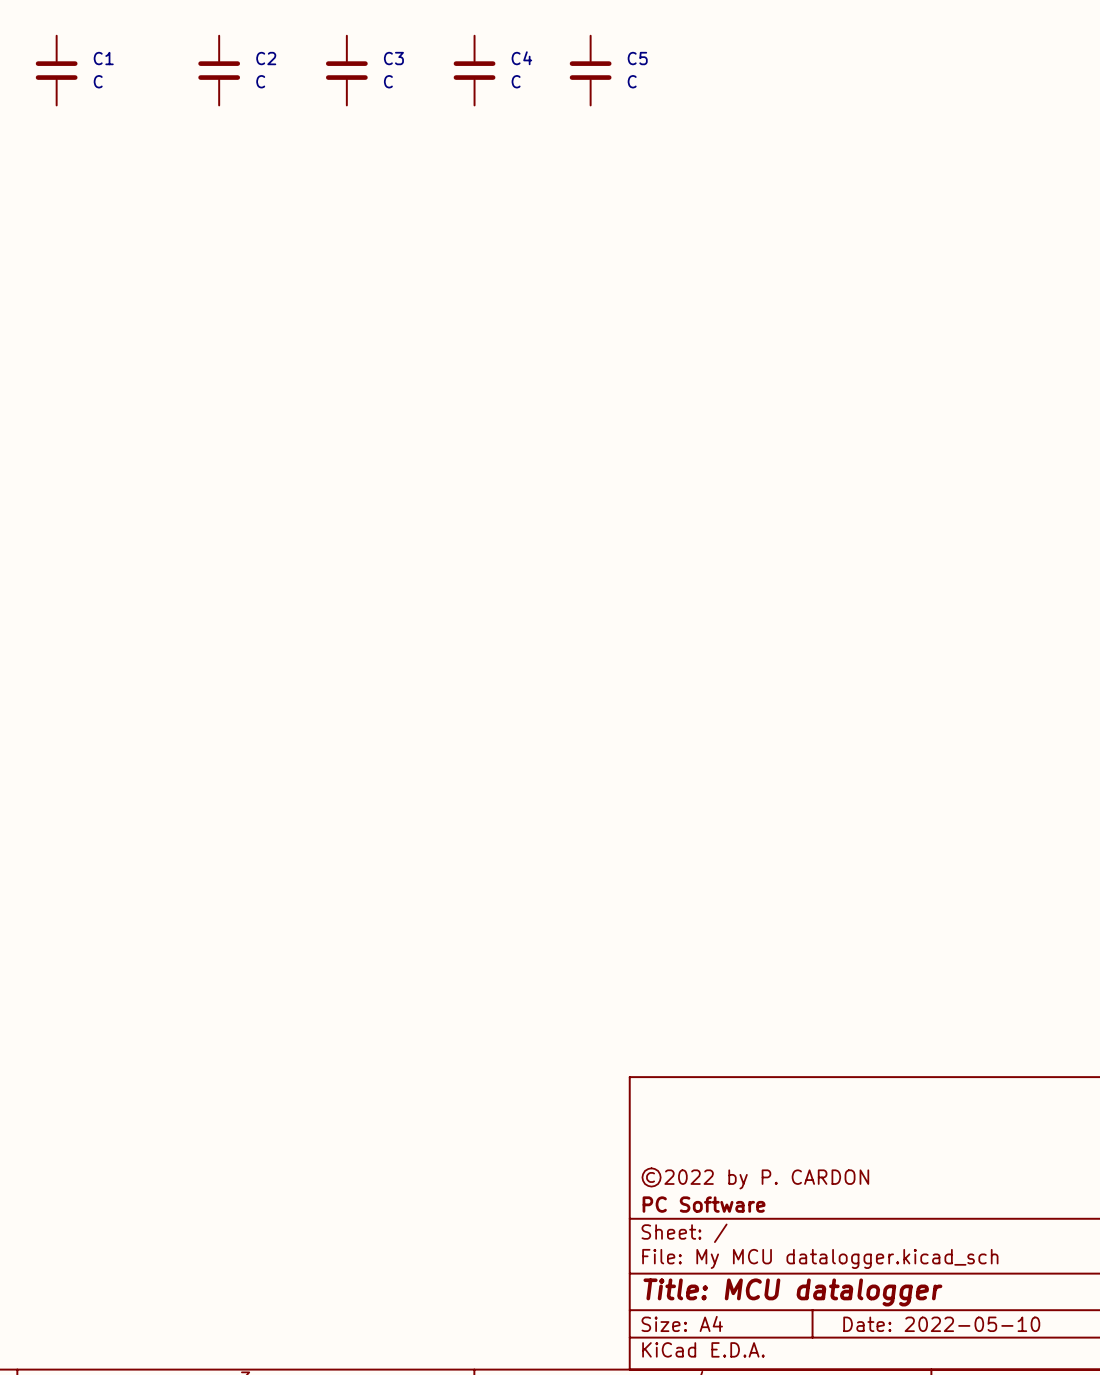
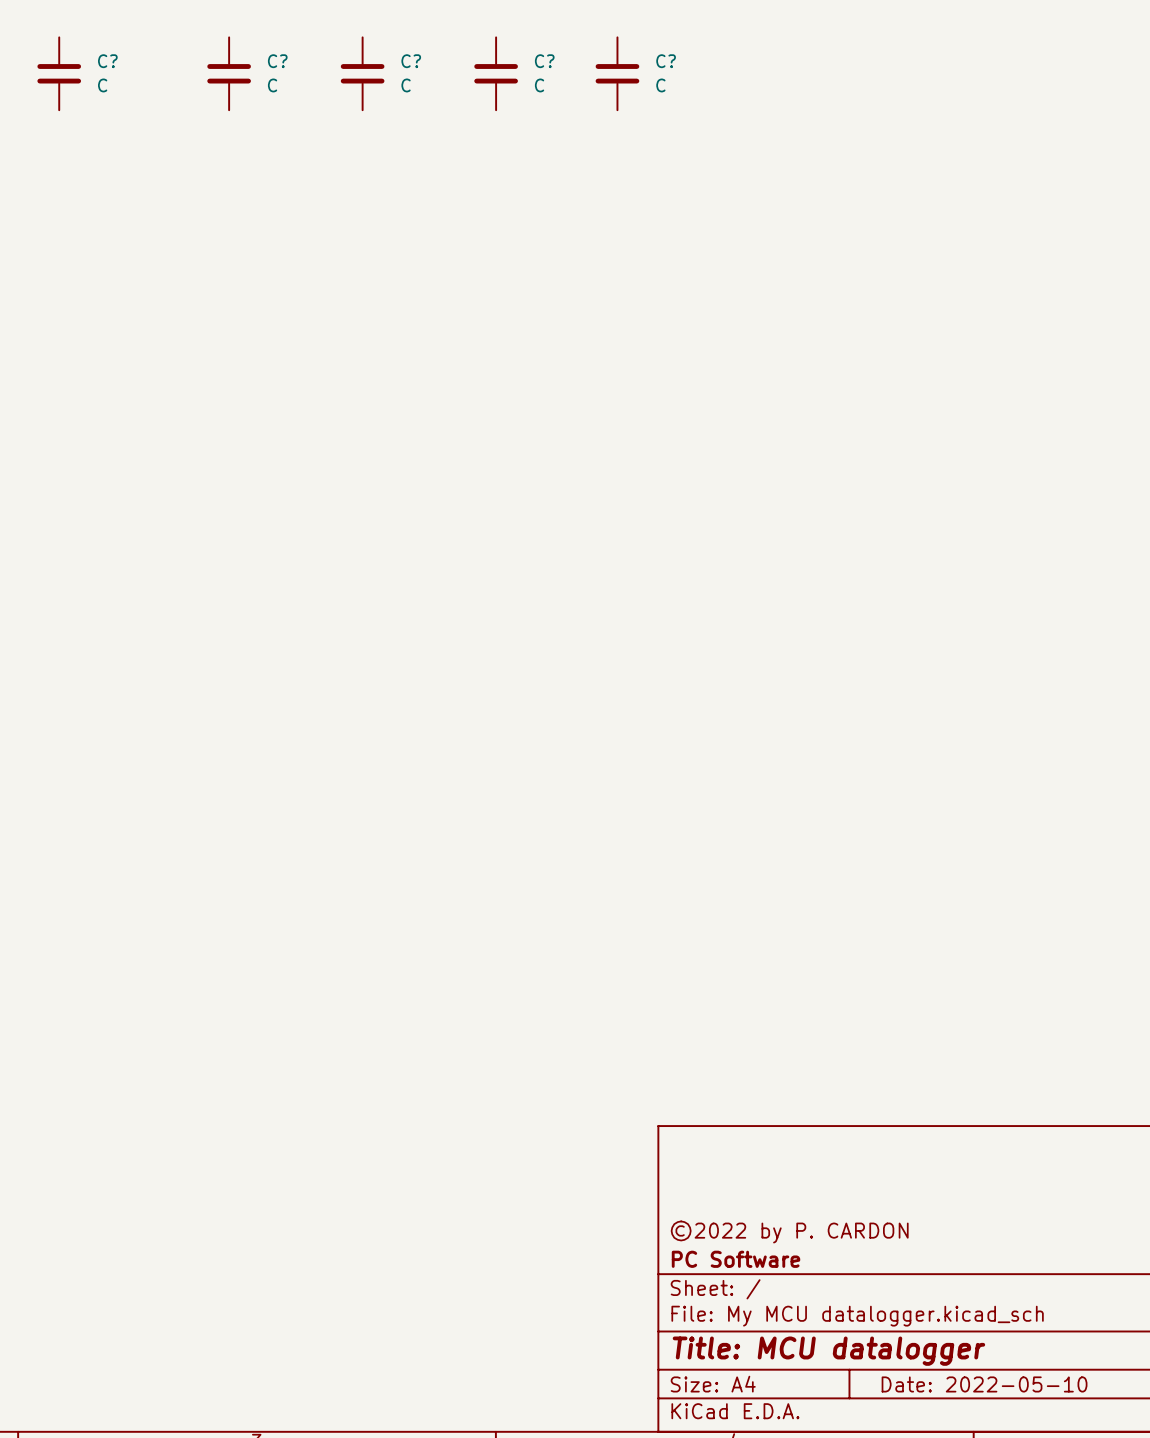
C1 name: C1 (103, 58) -> C? (107, 61)
C2 name: C2 (266, 58) -> C? (277, 61)
C3 name: C3 (393, 58) -> C? (411, 61)
C4 name: C4 (521, 58) -> C? (544, 61)
C5 name: C5 (637, 58) -> C? (666, 61)

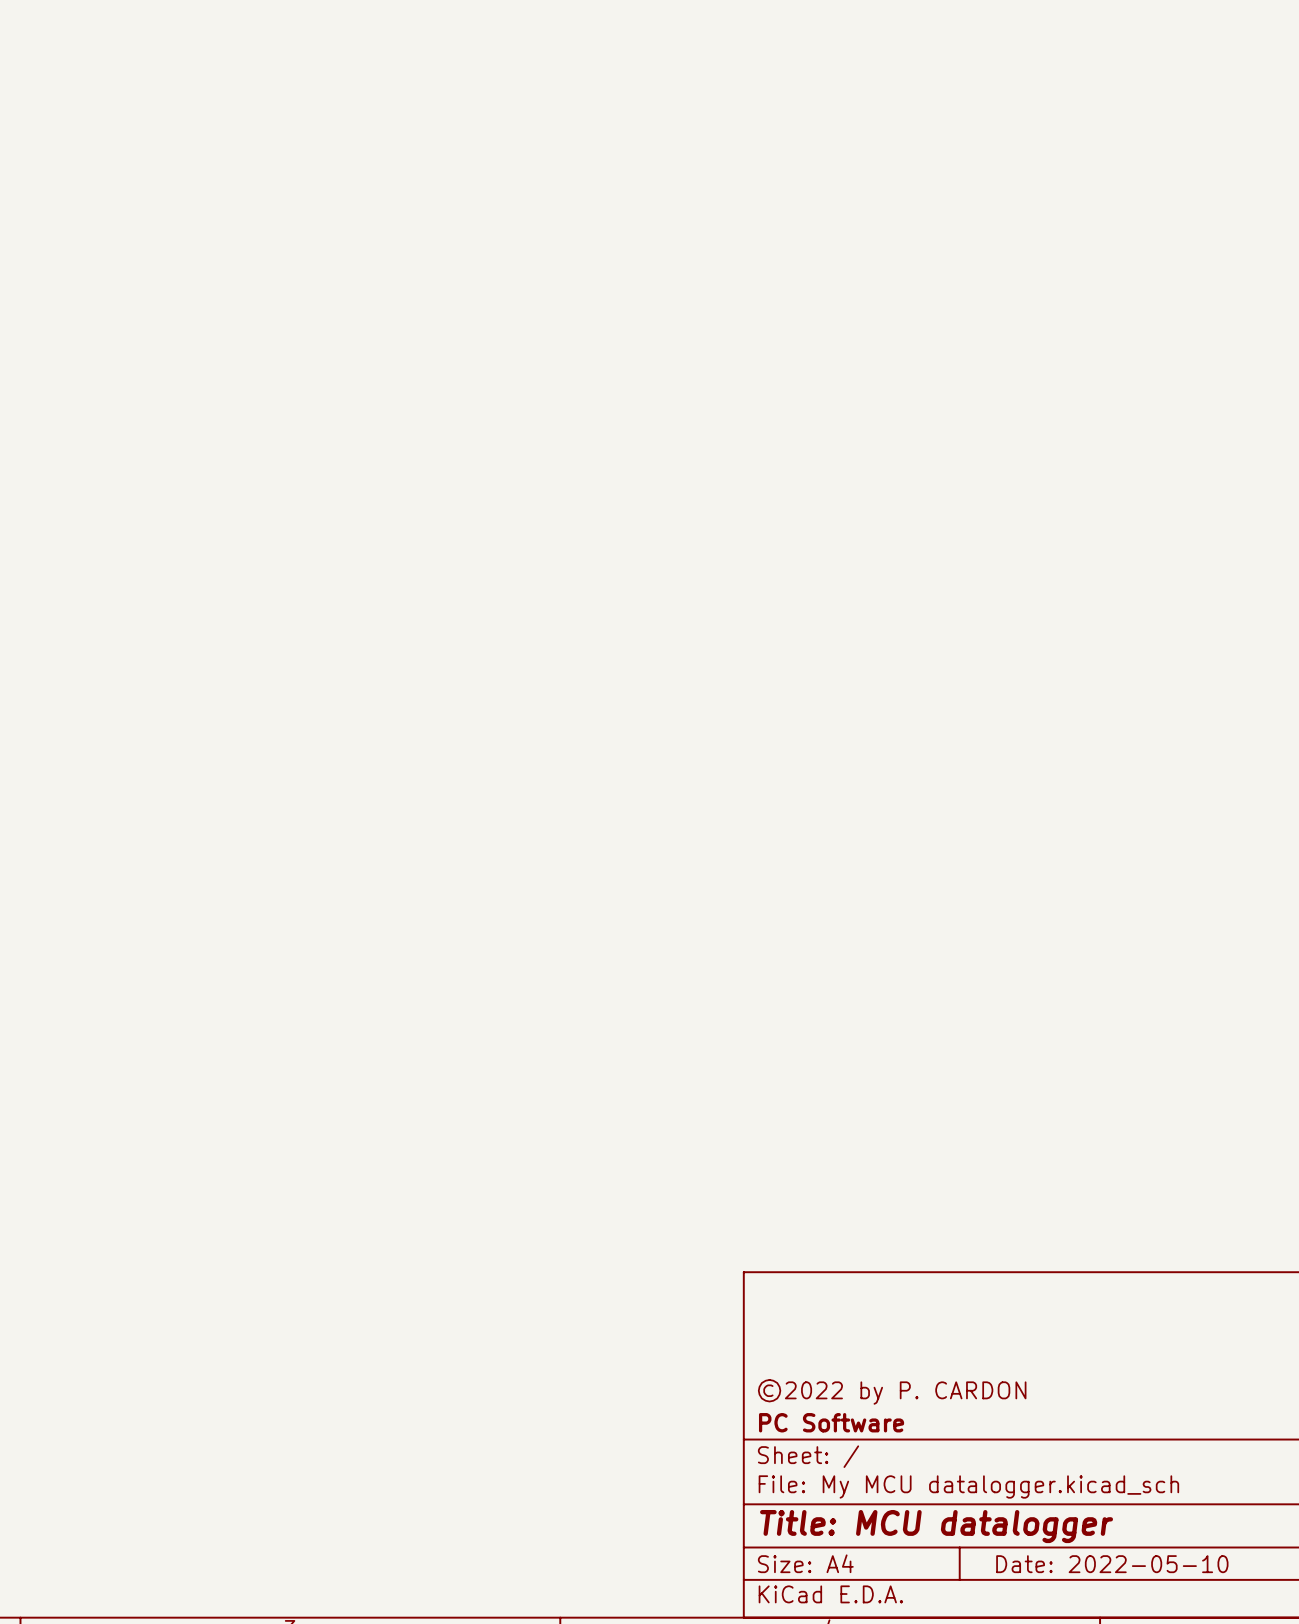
C?: C (59, 73) -> none
C?: C (229, 73) -> none
C?: C (362, 73) -> none
C?: C (496, 73) -> none
C?: C (617, 73) -> none

